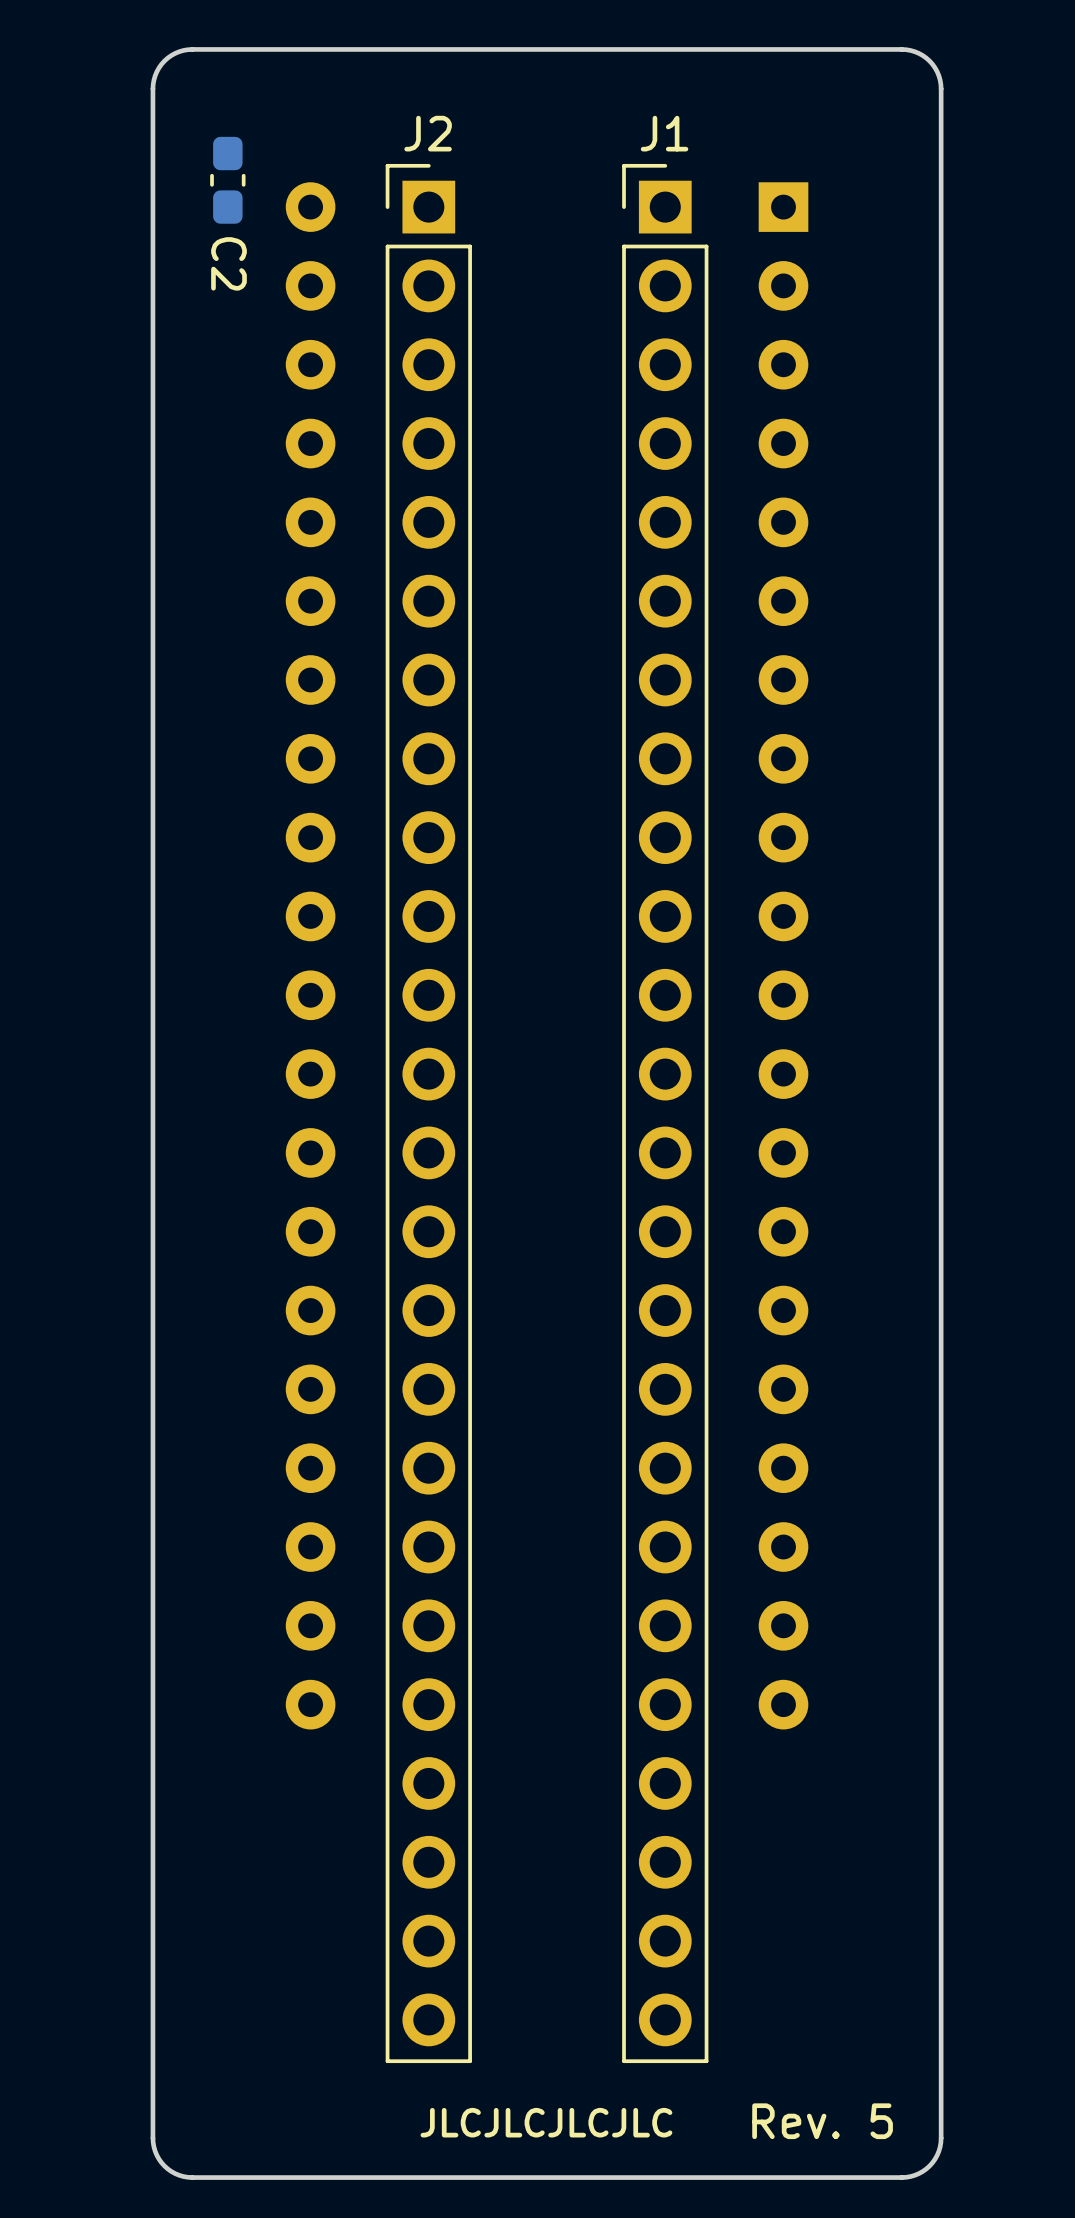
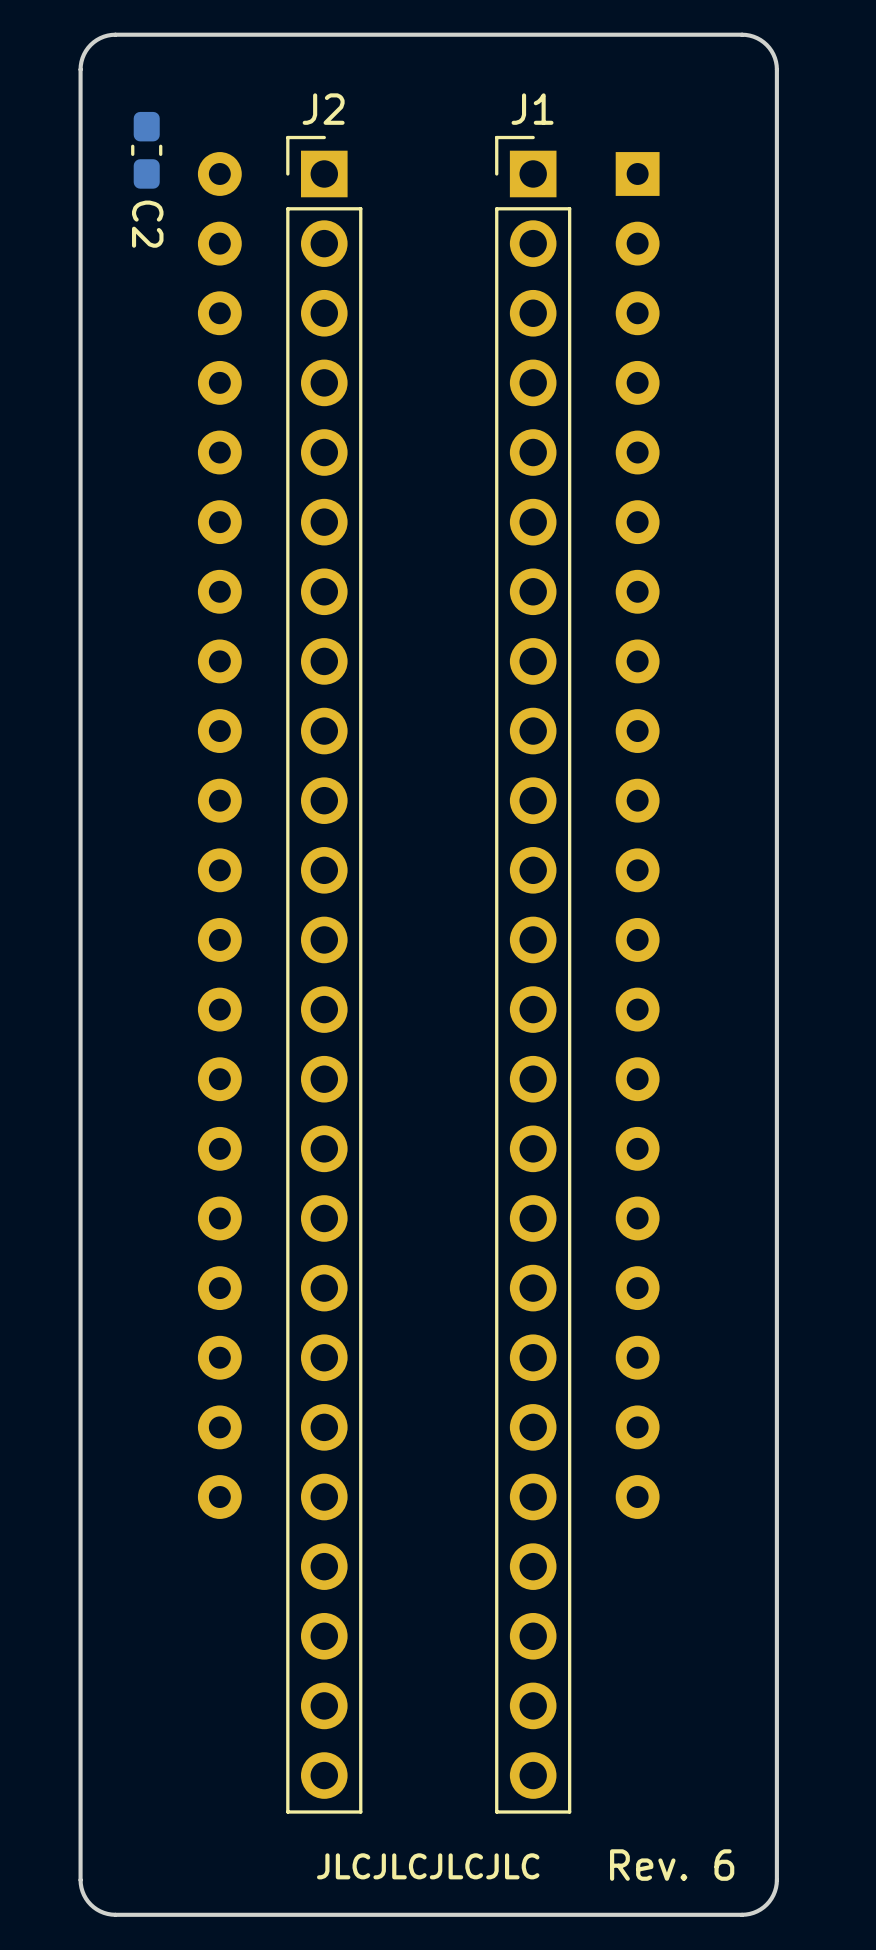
text: Rev. 5 (822, 2121) -> Rev. 6 (672, 1865)

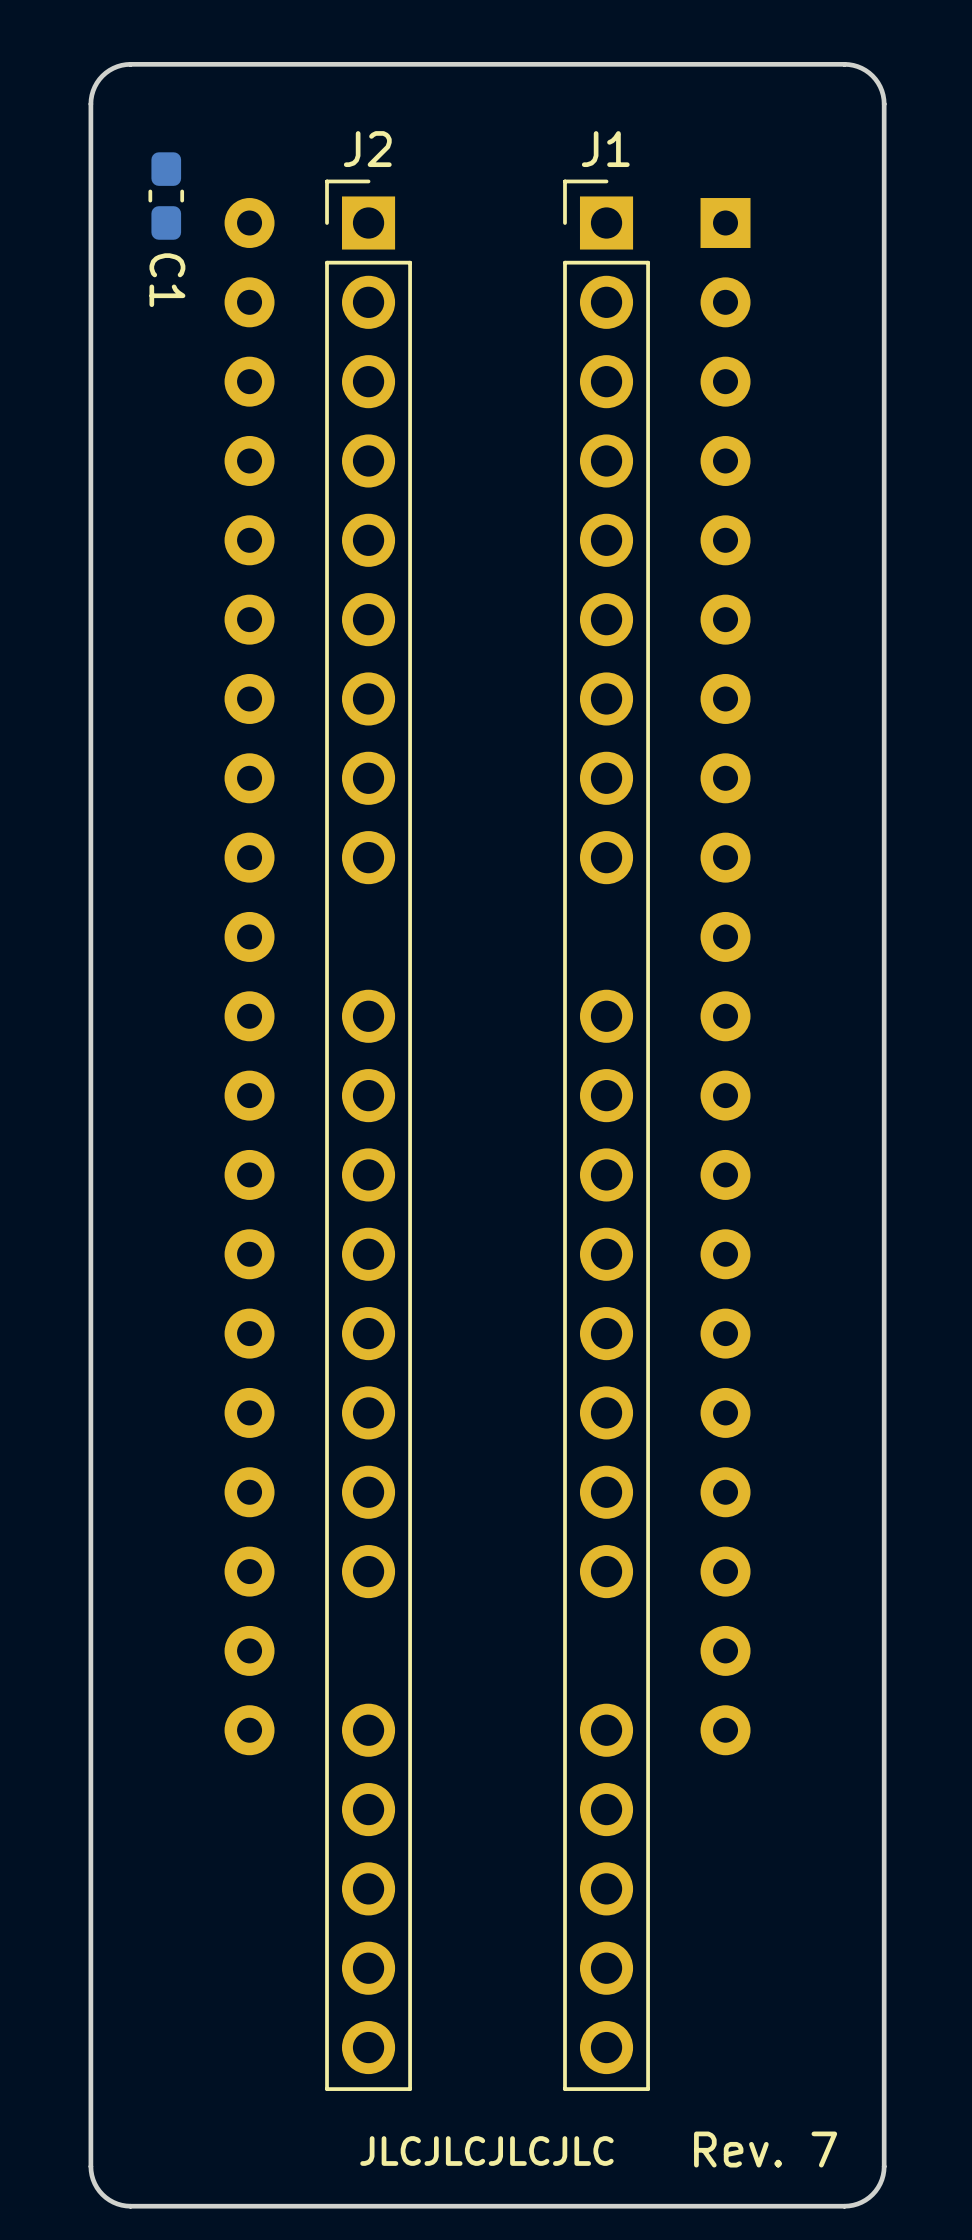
J2 footprint: [286, 135, 363, 1814] -> [325, 179, 412, 2091]
J1 footprint: [495, 135, 572, 1814] -> [563, 179, 650, 2091]
C2 name: C2 (147, 224) -> C1 (167, 280)
text: Rev. 6 (672, 1865) -> Rev. 7 (765, 2149)

